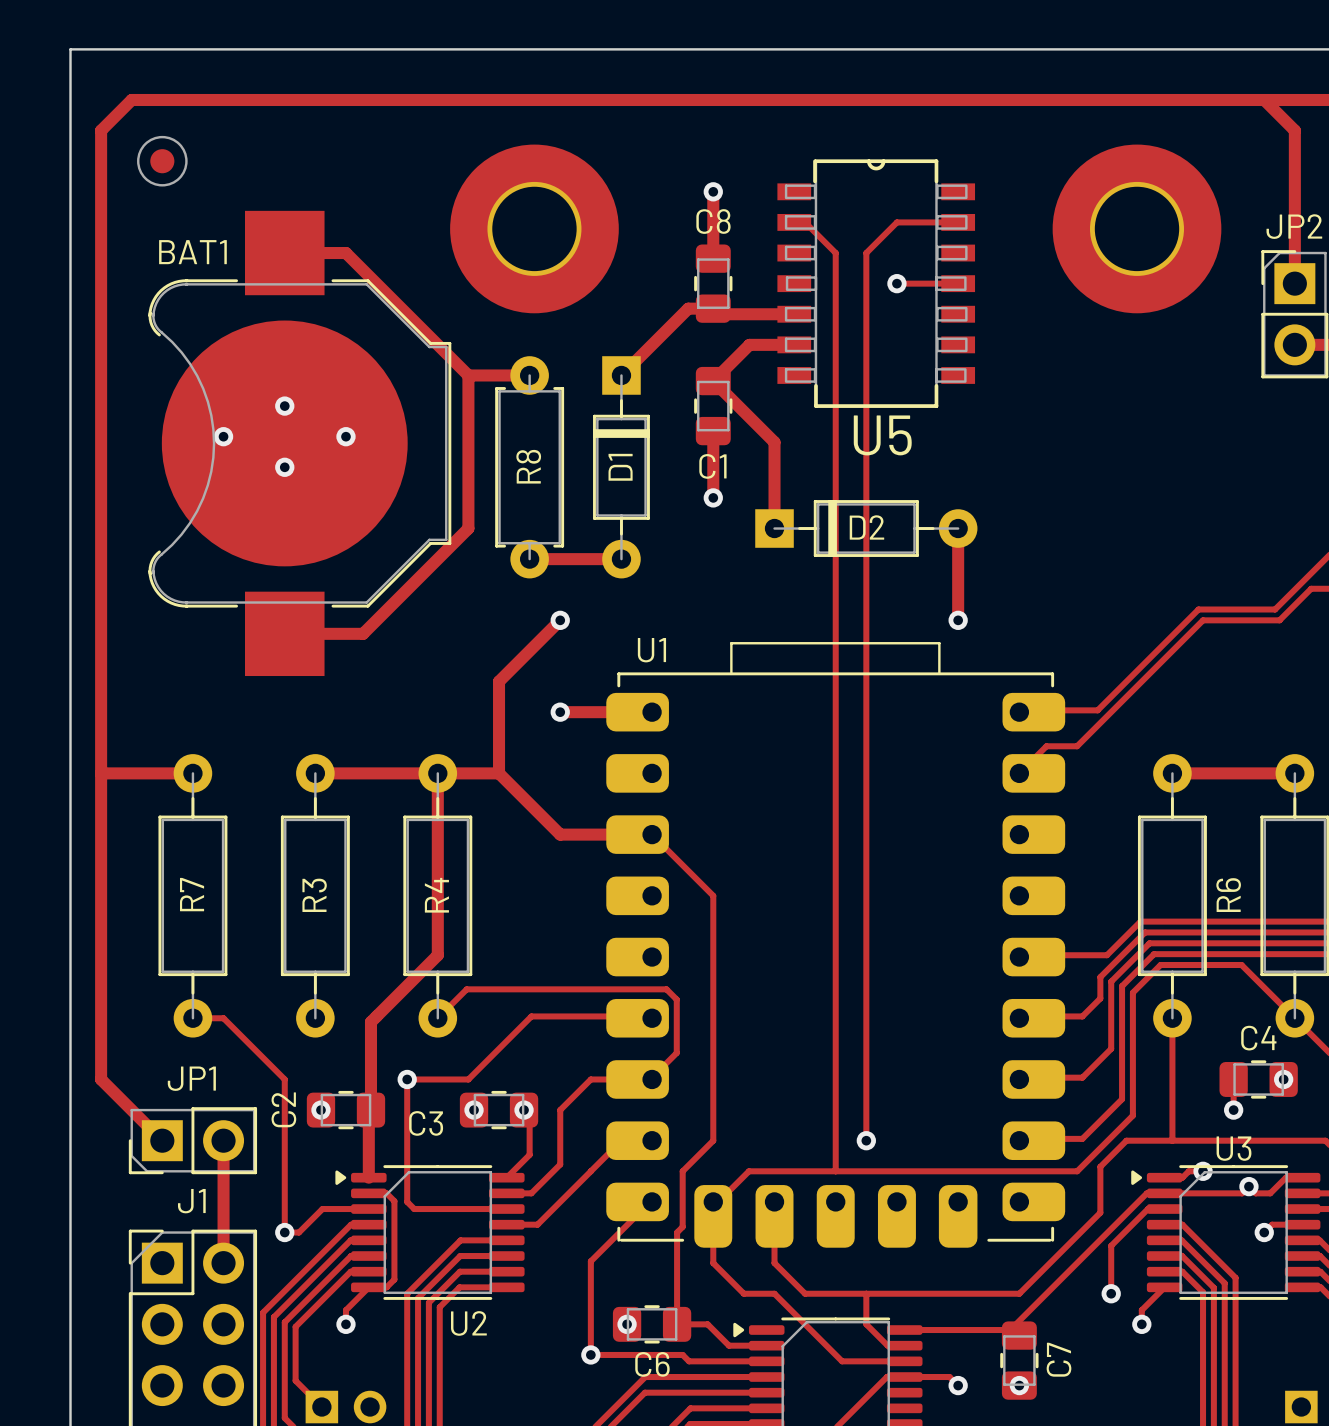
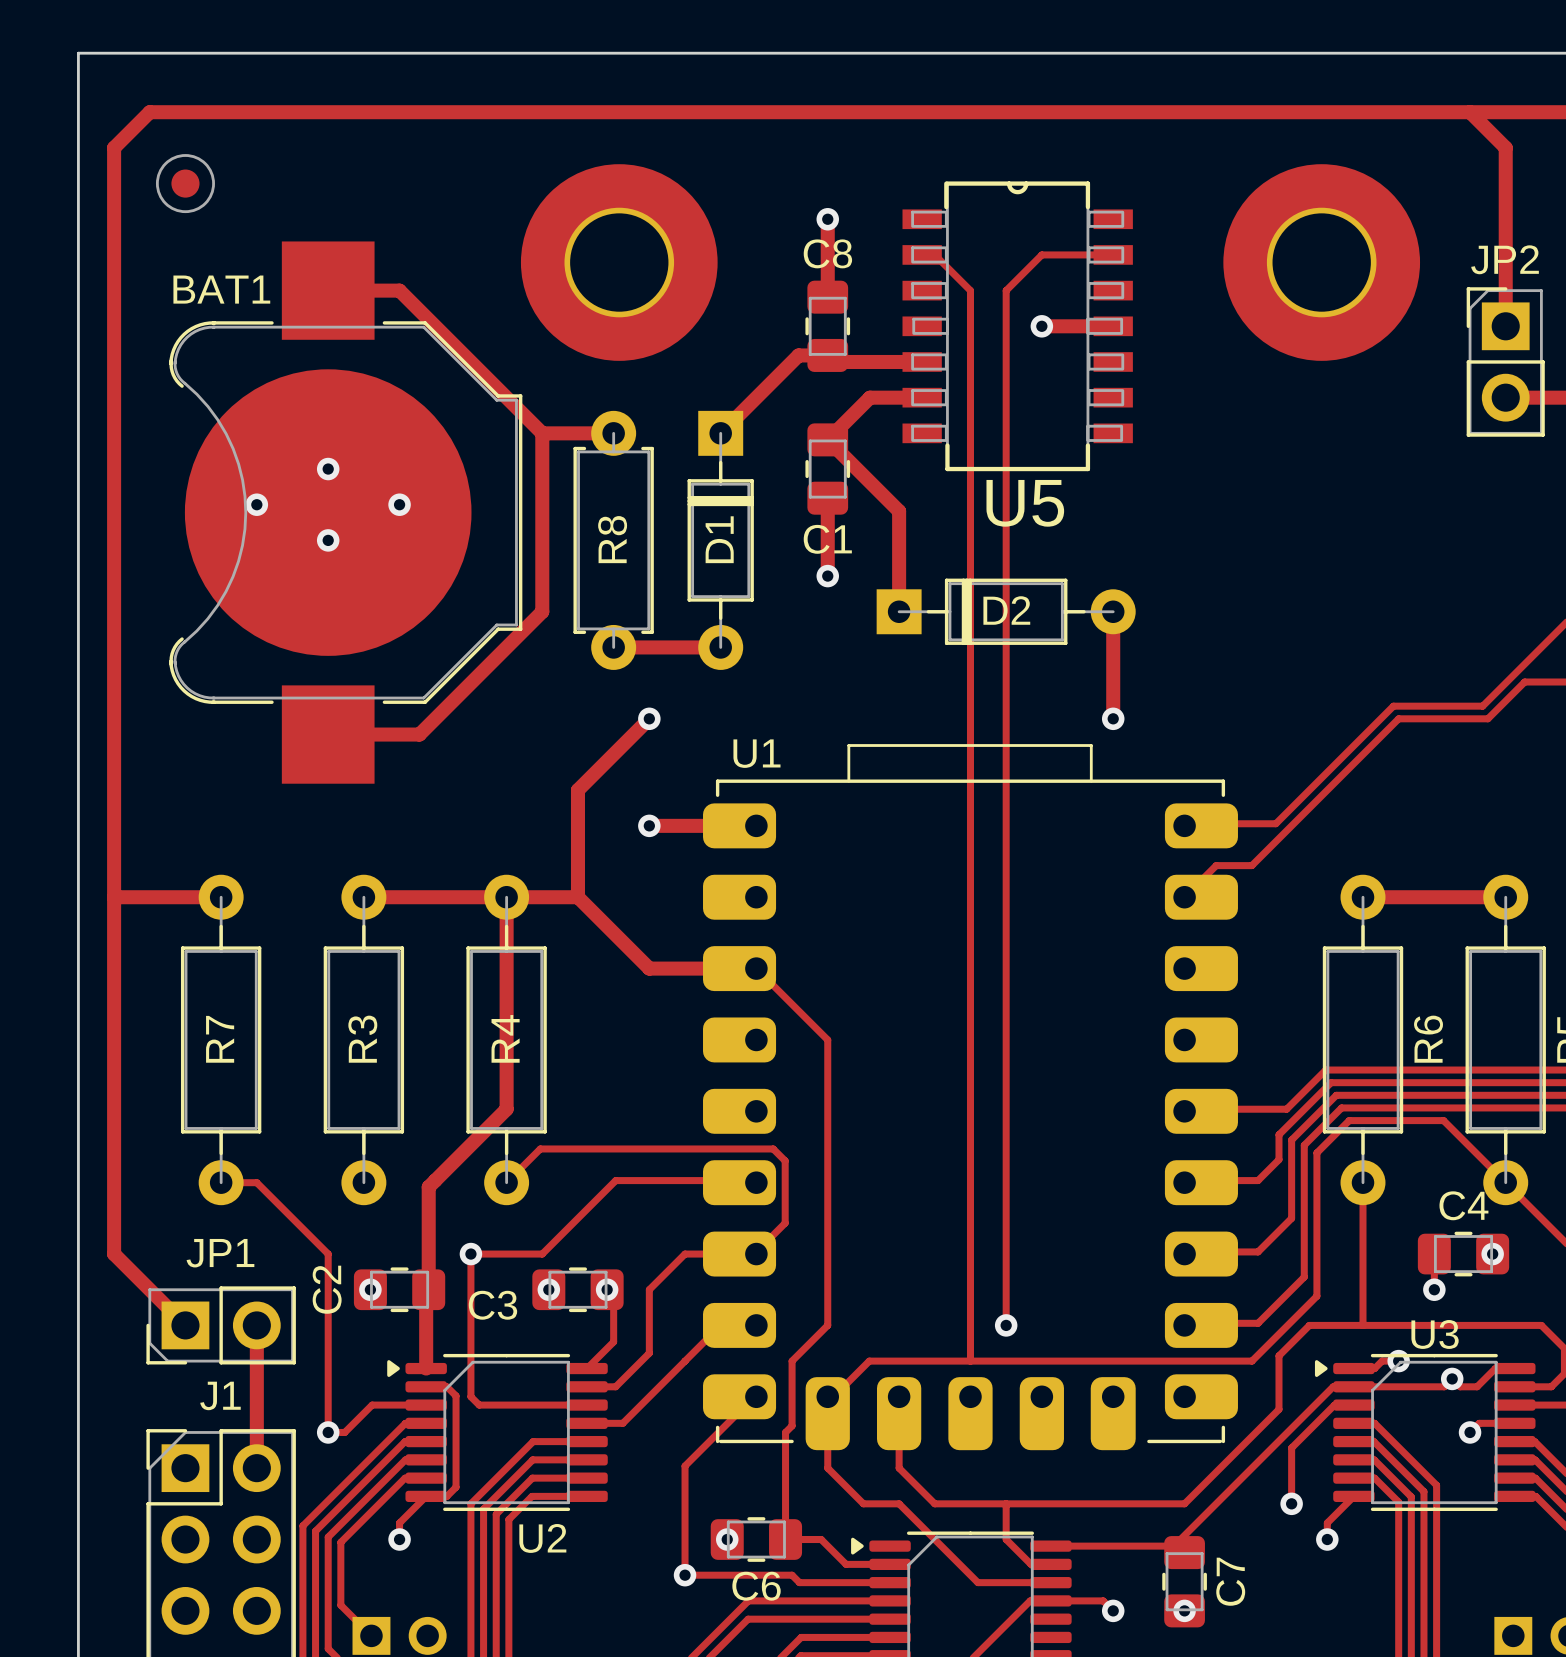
track width: thin (896, 283) (962, 283) -> thick (1041, 326) (1118, 326)

